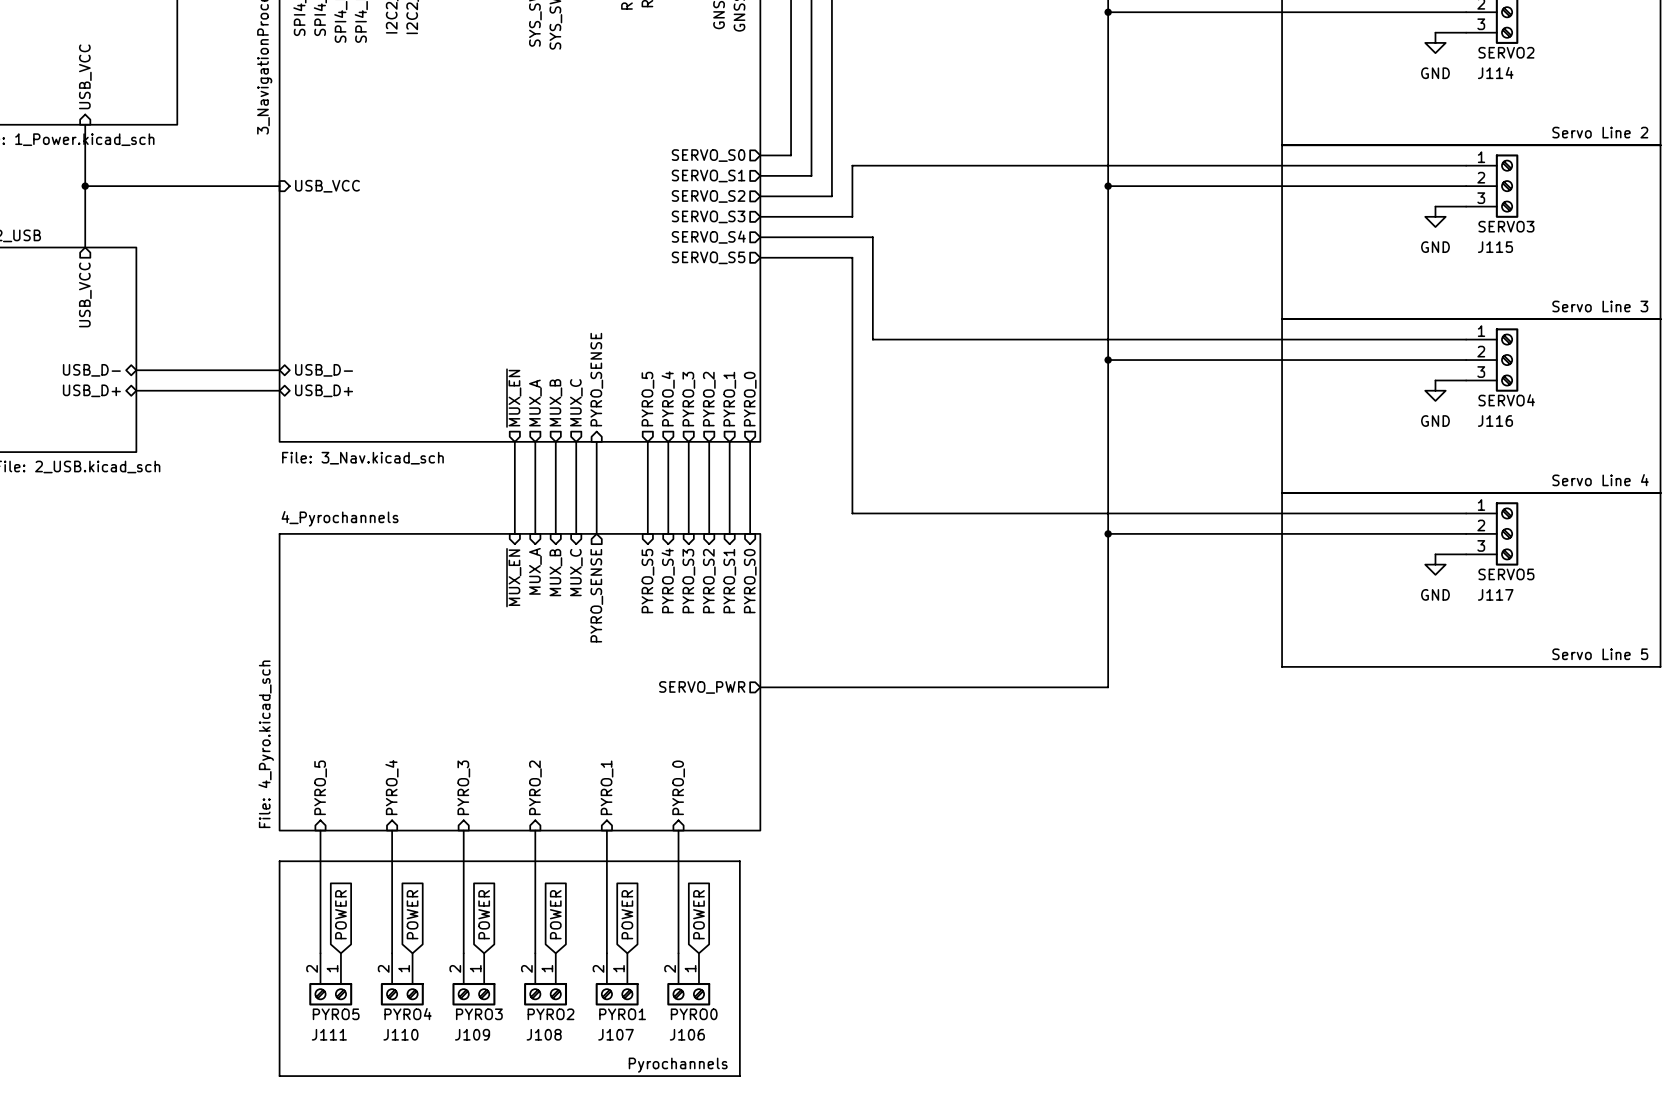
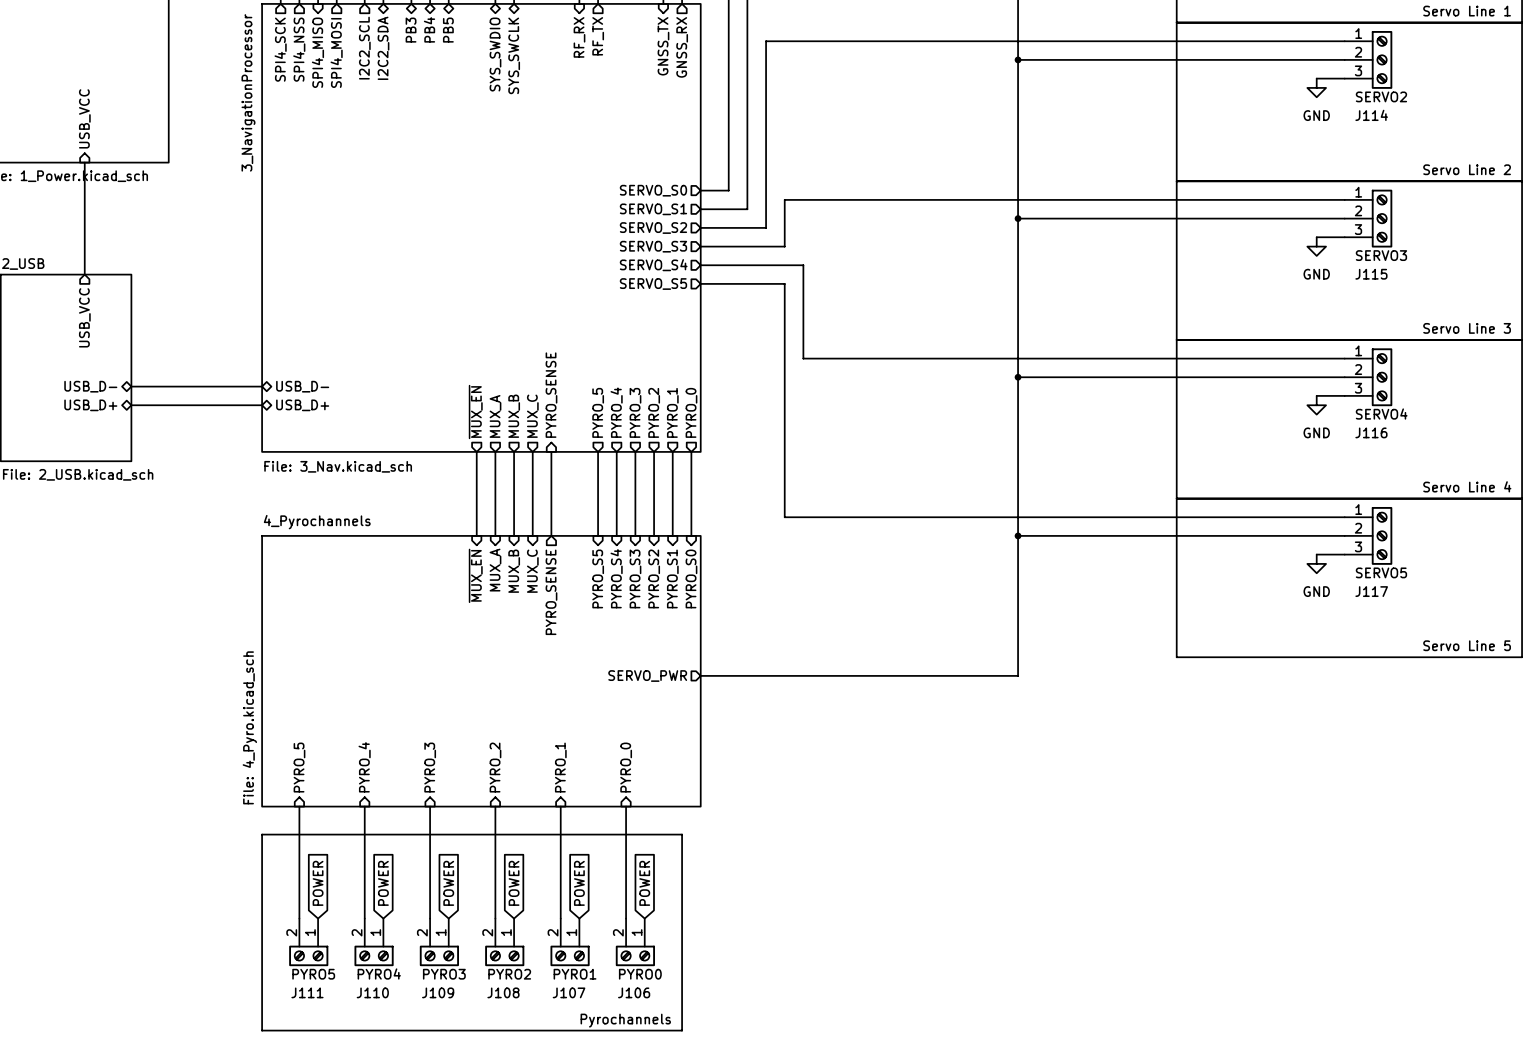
wire: (85, 186) (279, 186) -> none
junction: (85, 186) -> none
sheet pin: USB_VCC (327, 186) -> none

